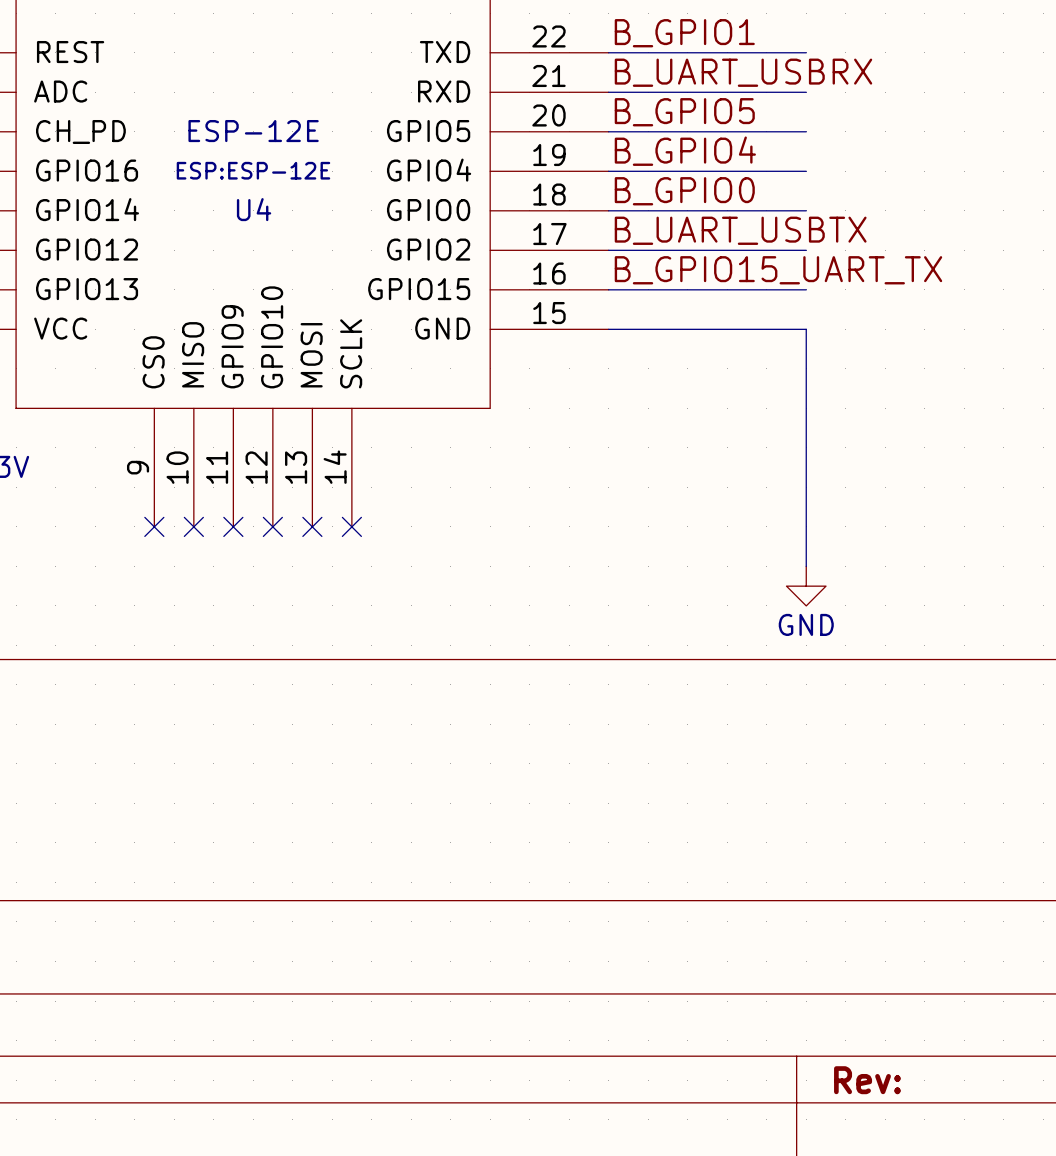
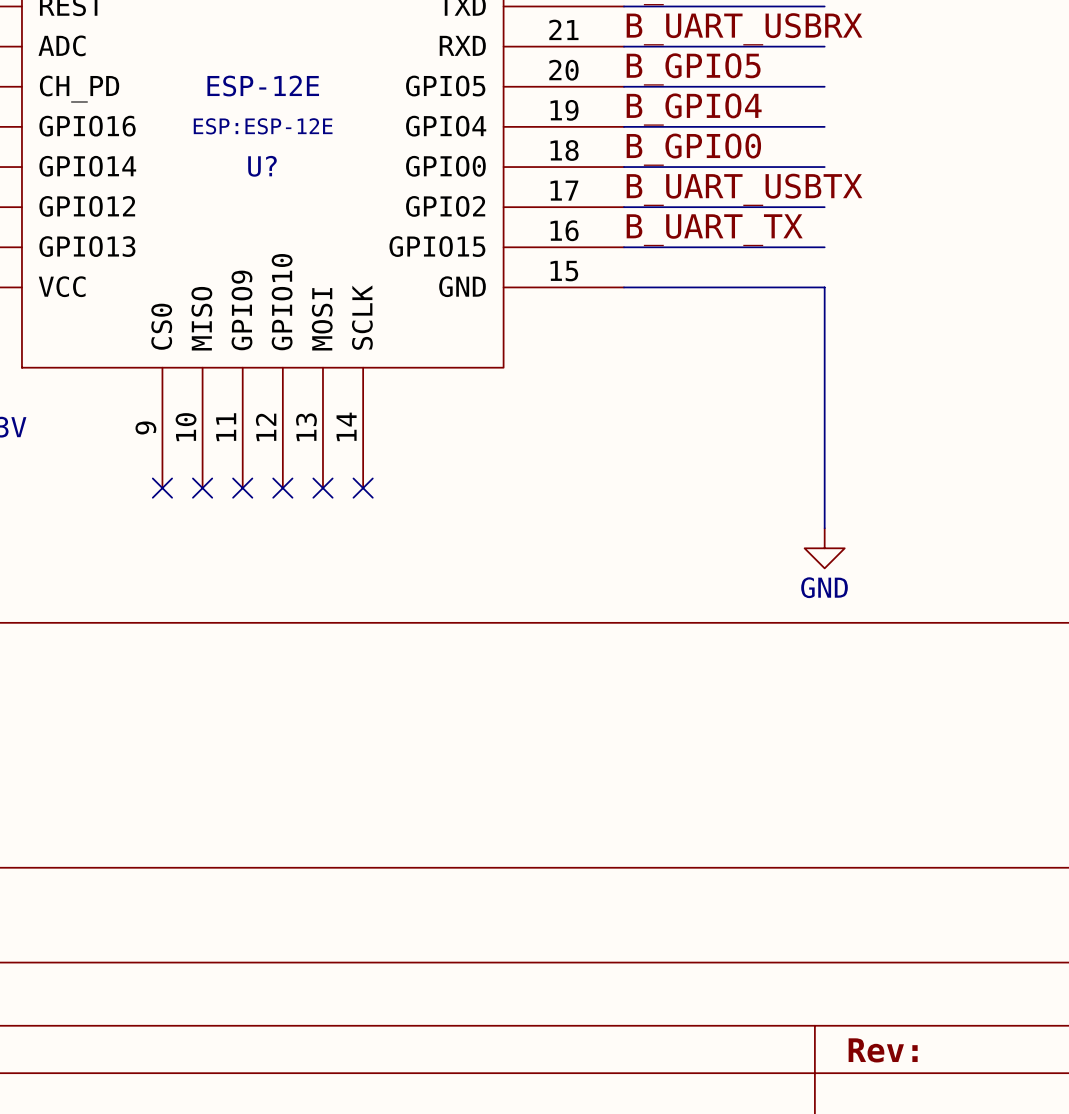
U4 name: U4 (254, 209) -> U? (262, 166)
label: B_GPIO15_UART_TX (778, 270) -> B_UART_TX (714, 230)

